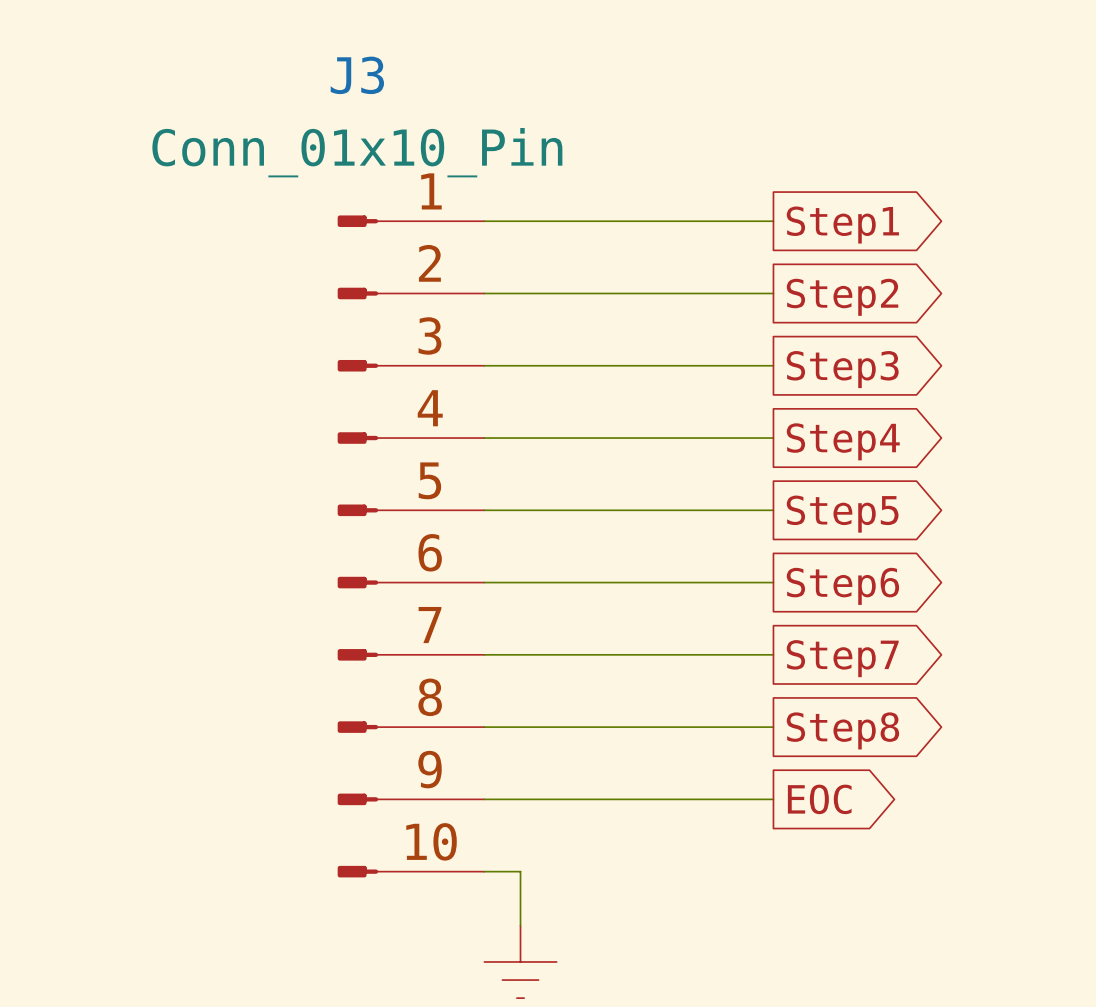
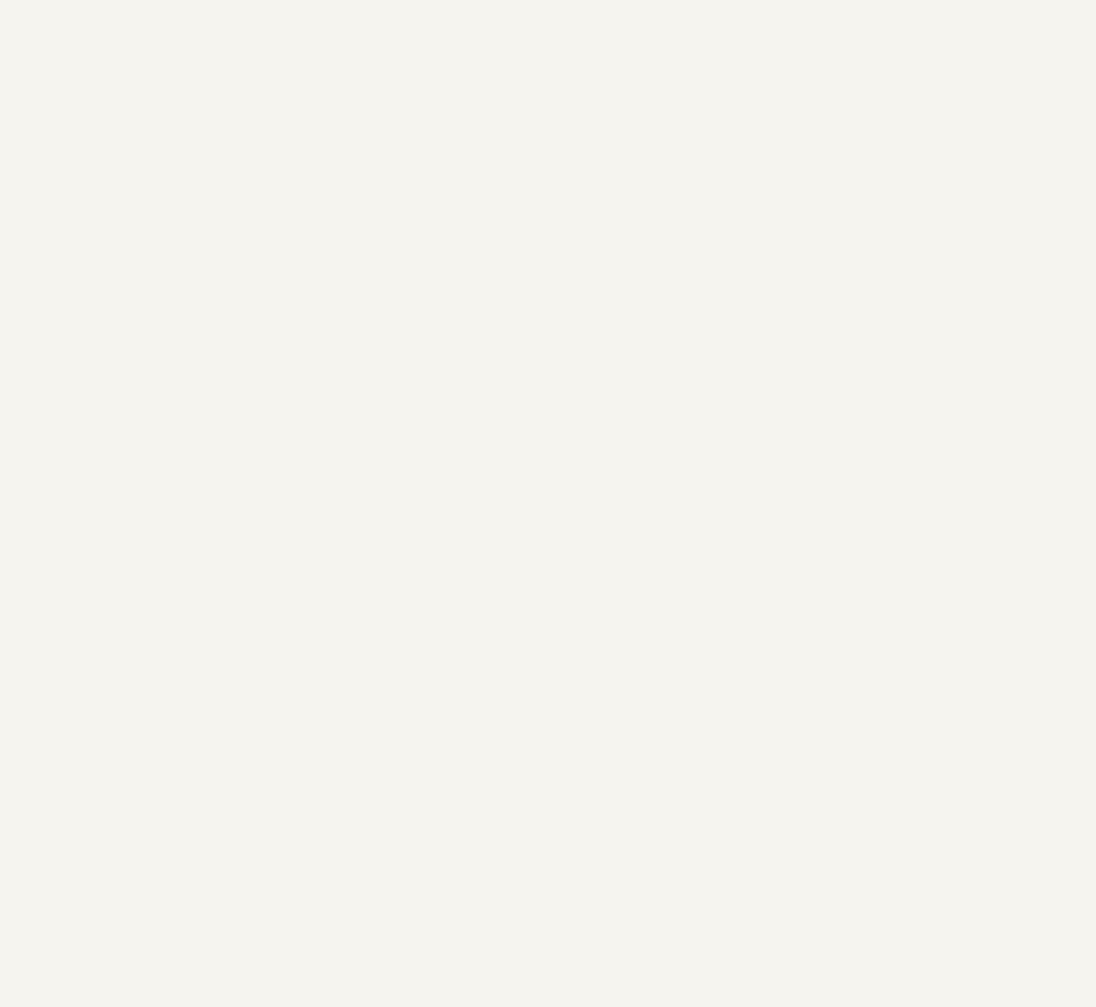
wire: (484, 221) (773, 221) -> none
global label: Step1 (842, 225) -> none
wire: (484, 293) (773, 293) -> none
global label: Step2 (842, 297) -> none
wire: (484, 365) (773, 365) -> none
global label: Step3 (842, 369) -> none
wire: (484, 438) (773, 438) -> none
global label: Step4 (843, 441) -> none
wire: (484, 510) (773, 510) -> none
global label: Step5 (842, 514) -> none
J3: Conn_01x10_Pin (411, 546) -> none
wire: (484, 582) (773, 582) -> none
global label: Step6 (842, 586) -> none
wire: (484, 654) (773, 654) -> none
global label: Step7 (842, 658) -> none
wire: (484, 727) (773, 727) -> none
global label: Step8 (842, 730) -> none
wire: (484, 799) (773, 799) -> none
global label: EOC (819, 799) -> none
wire: (484, 871) (520, 871) (520, 925) -> none
power symbol: (520, 961) -> none

